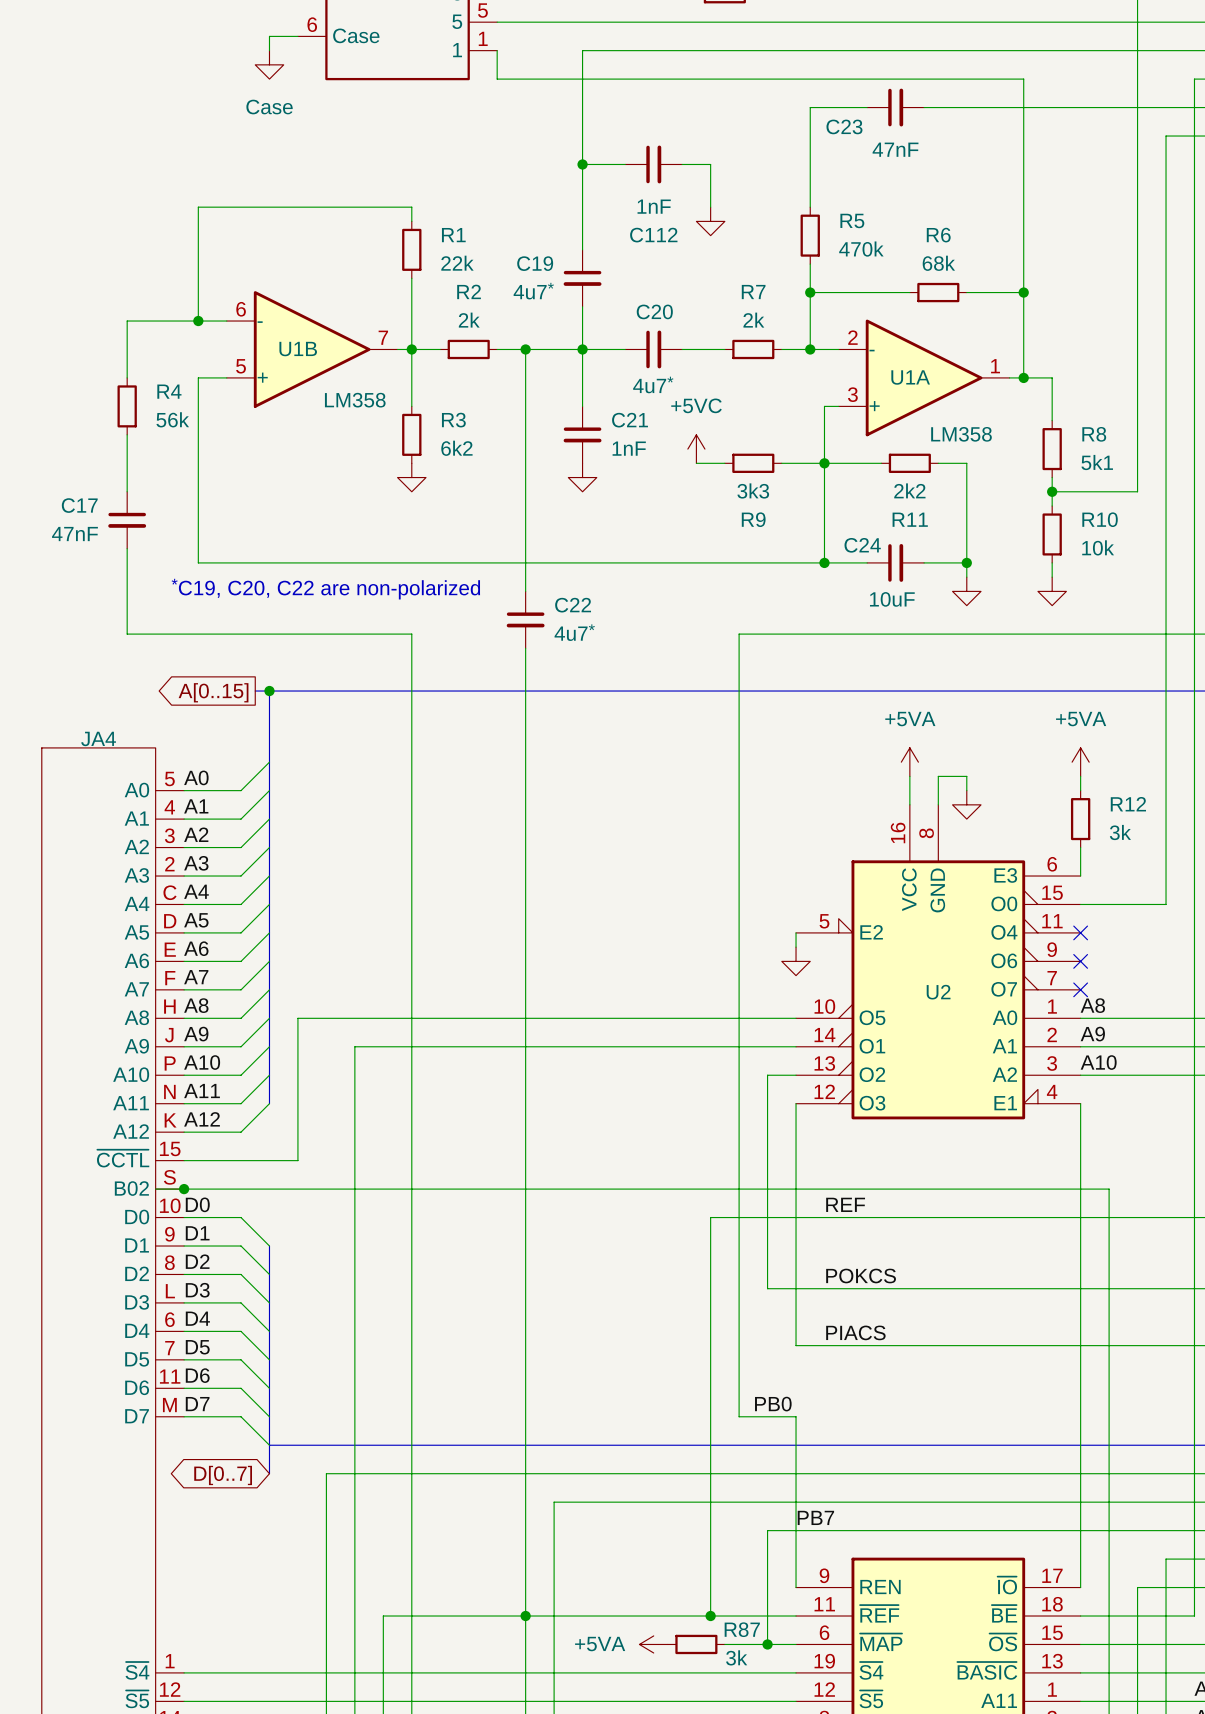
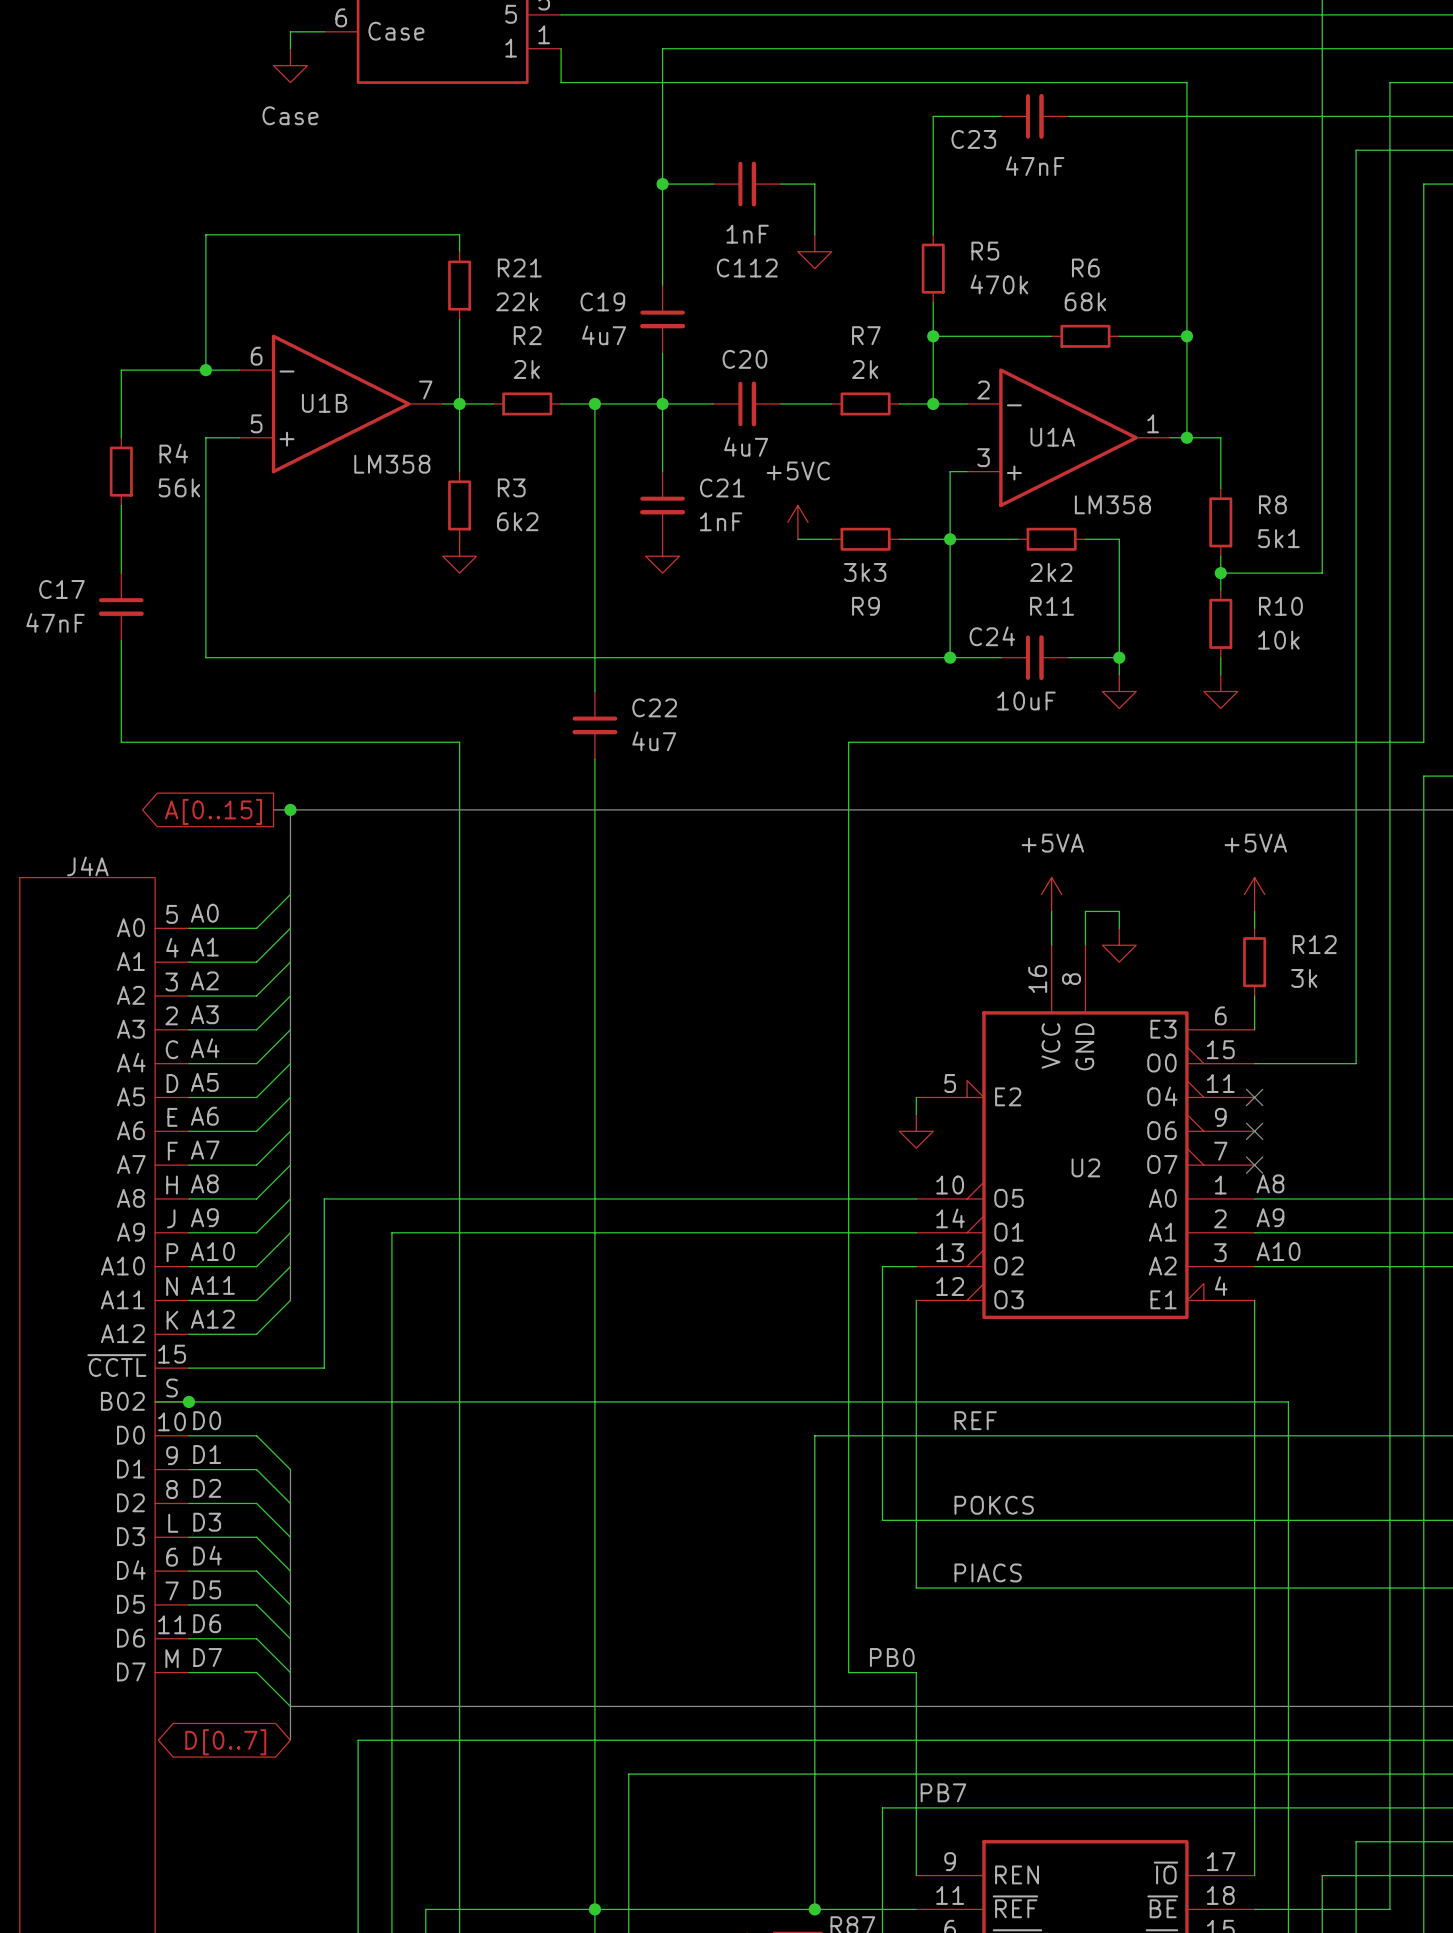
R1 name: R1 (453, 235) -> R21 (519, 268)
C19 value: 4u7* (533, 291) -> 4u7 (604, 335)
C20 value: 4u7* (653, 384) -> 4u7 (746, 446)
text: *C19, C20, C22 are non-polarized (325, 589) -> none
C22 value: 4u7* (574, 632) -> 4u7 (654, 741)
JA4 name: JA4 (98, 738) -> J4A (87, 866)

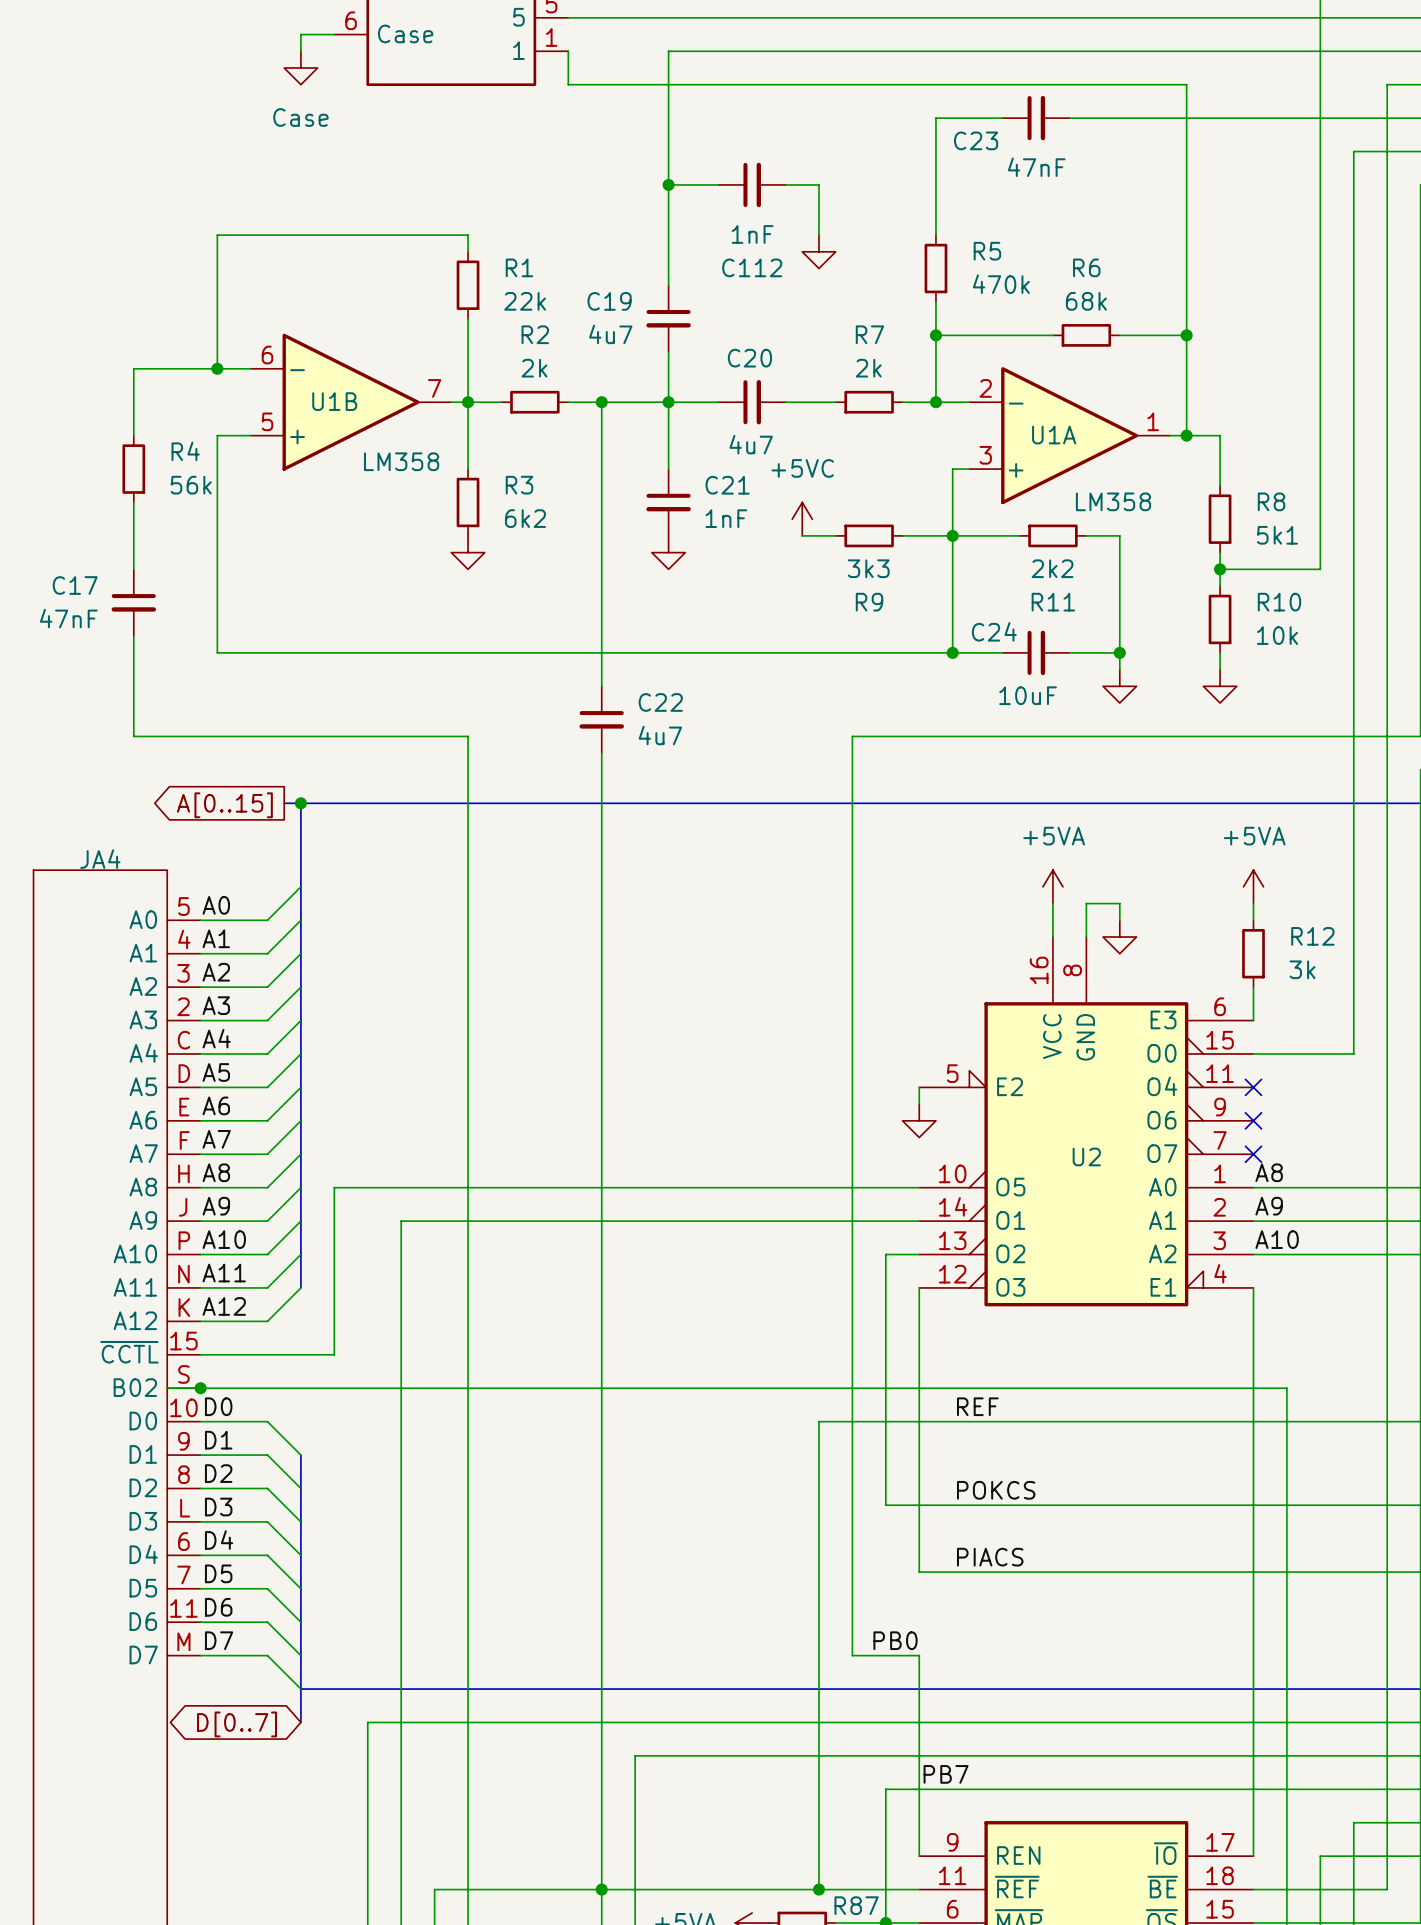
R21 name: R21 (519, 268) -> R1 (519, 267)
J4A name: J4A (87, 866) -> JA4 (100, 859)

